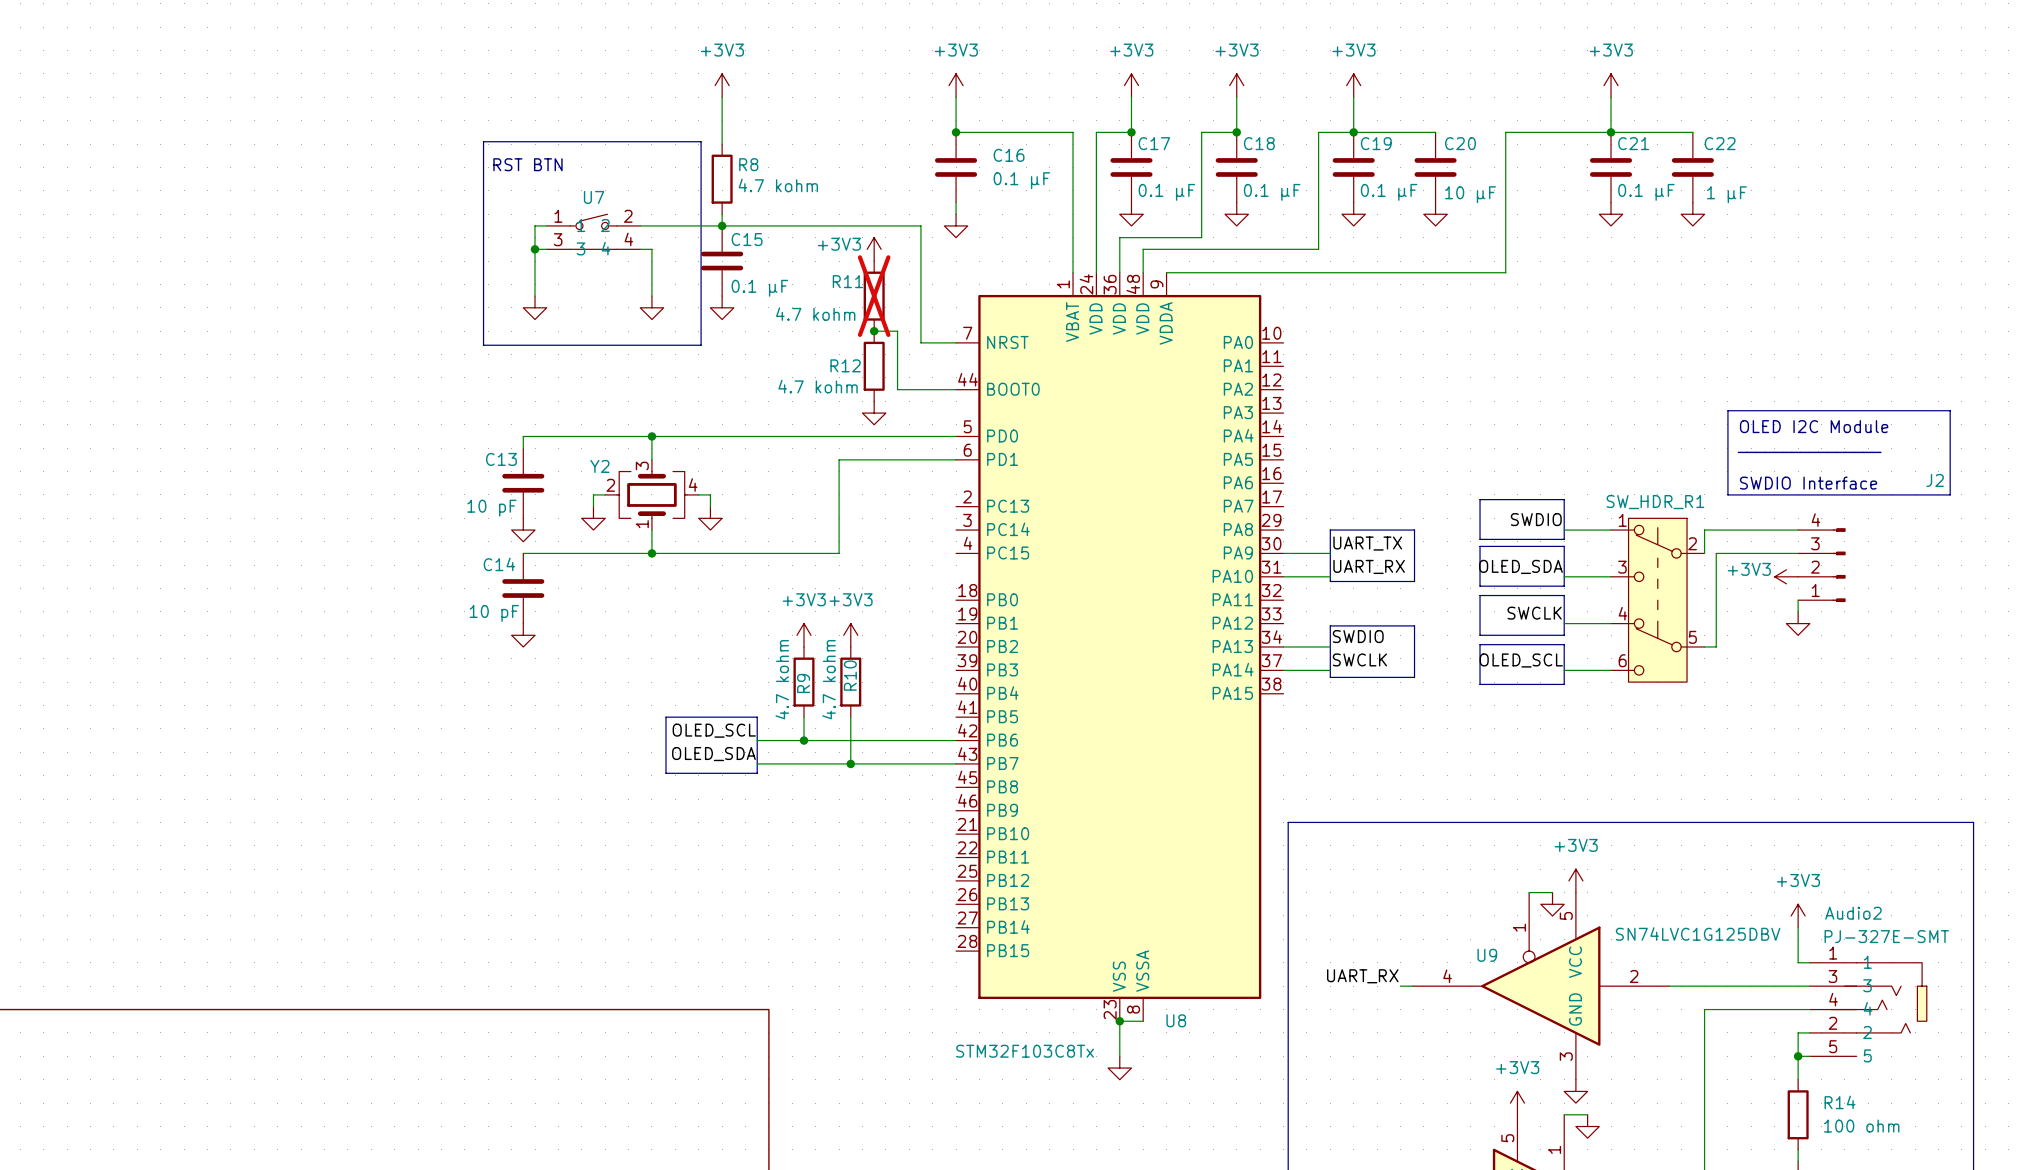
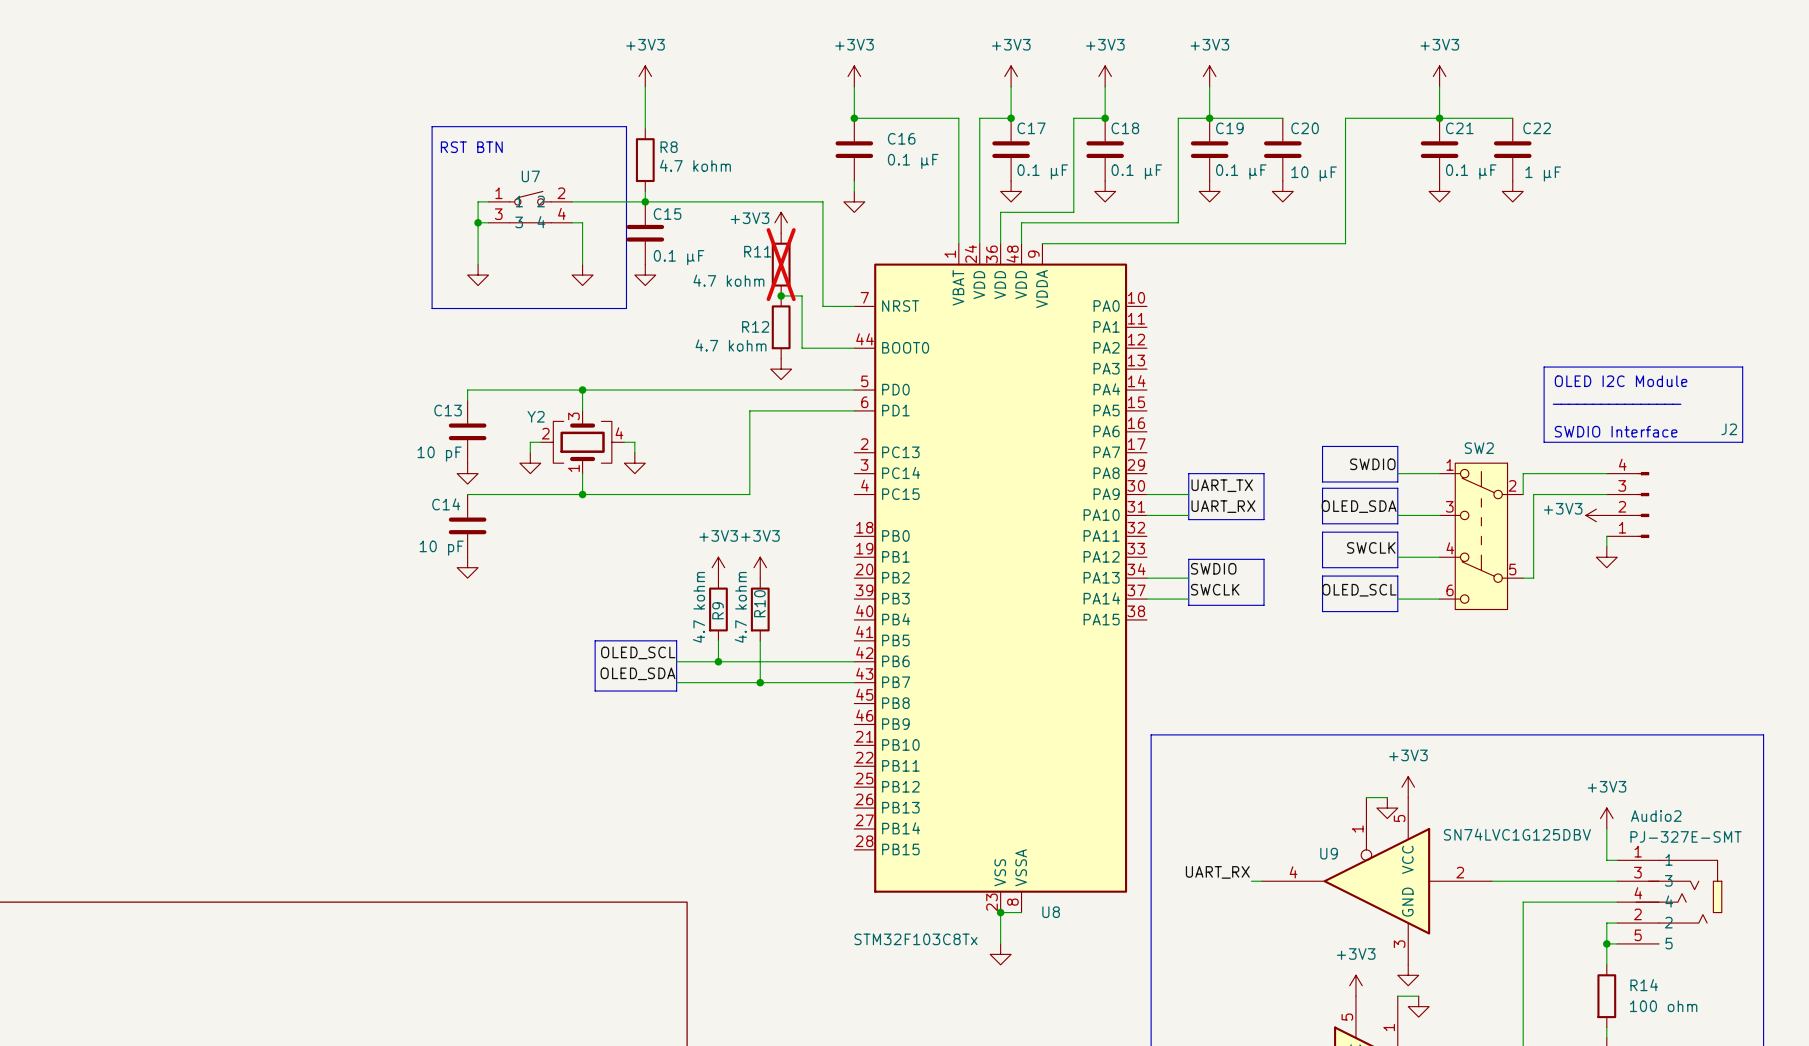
SW_HDR_R1 name: SW_HDR_R1 (1655, 502) -> SW2 (1479, 448)

